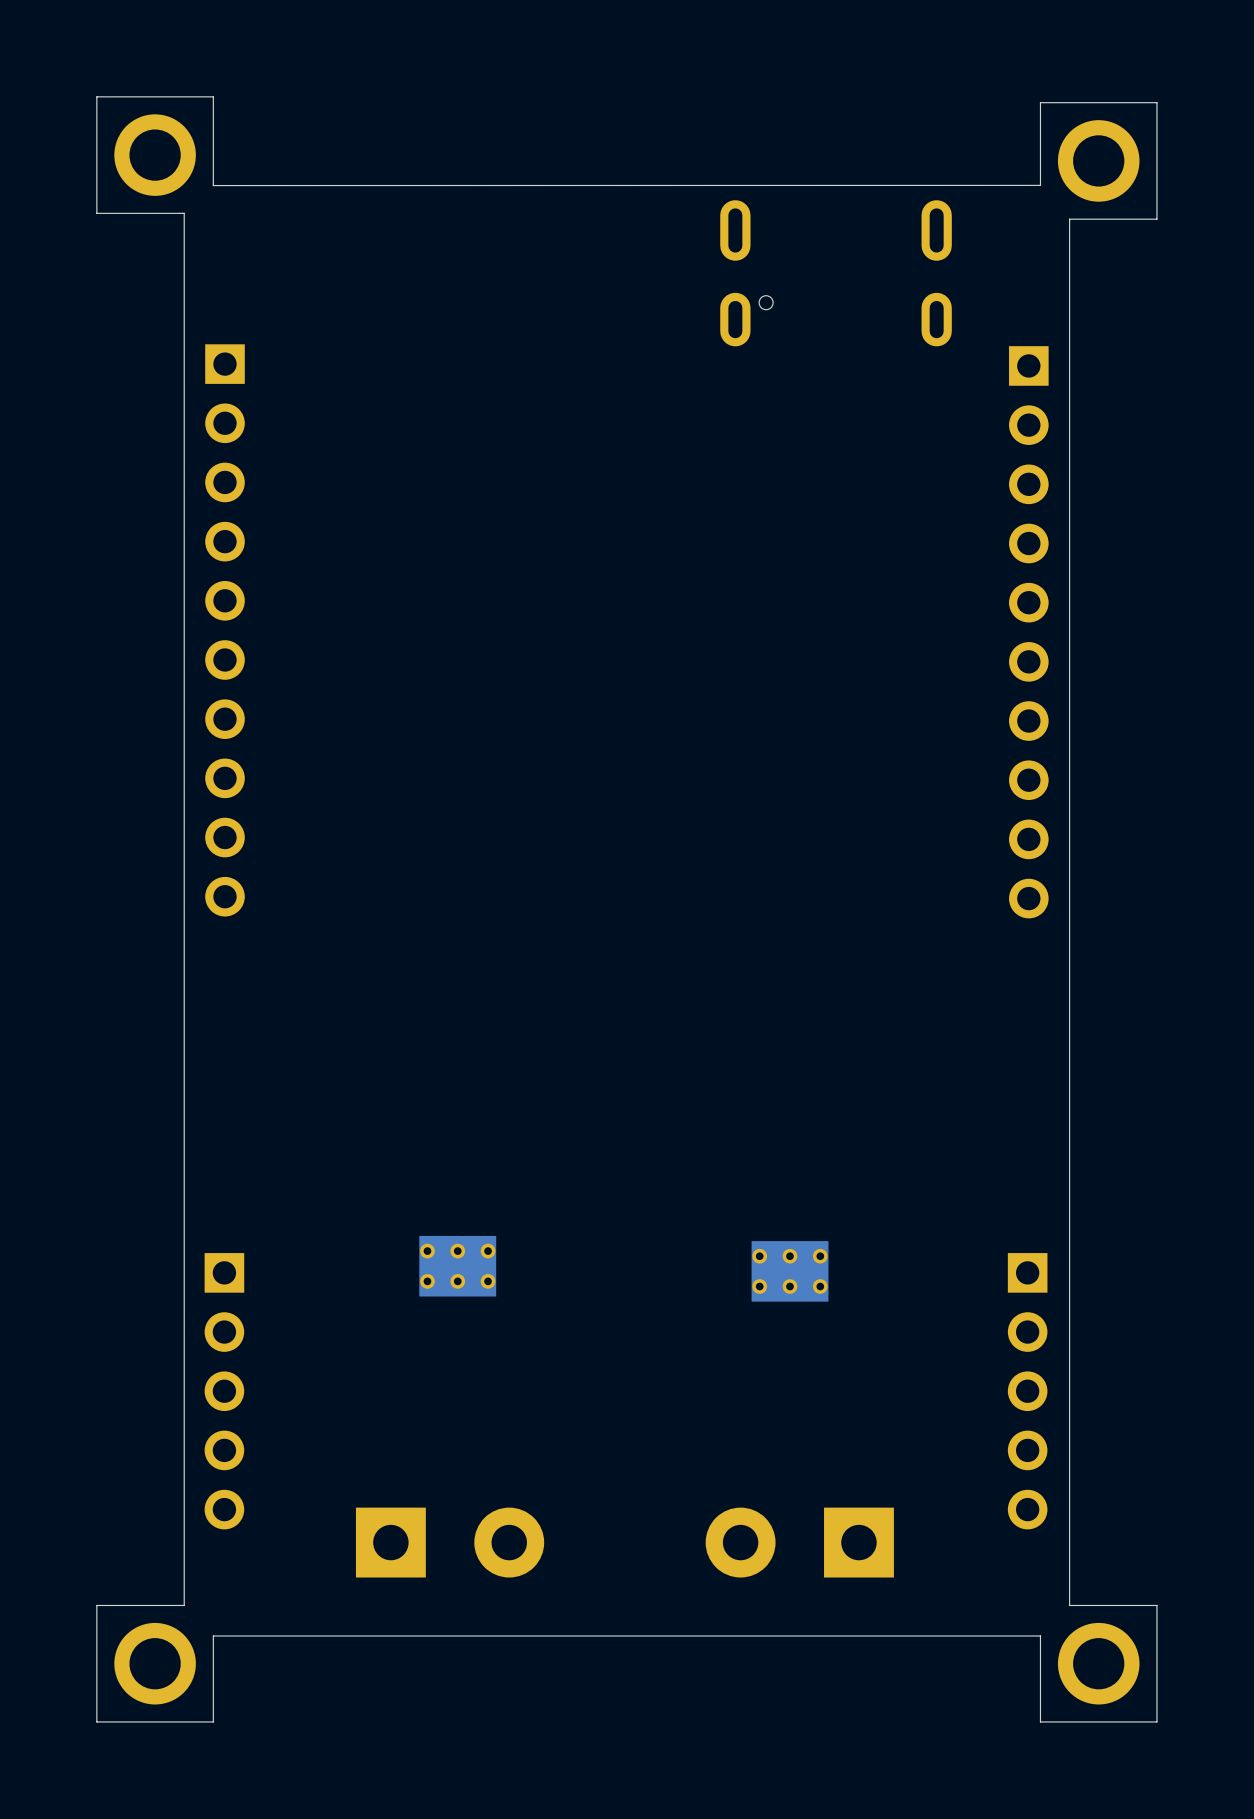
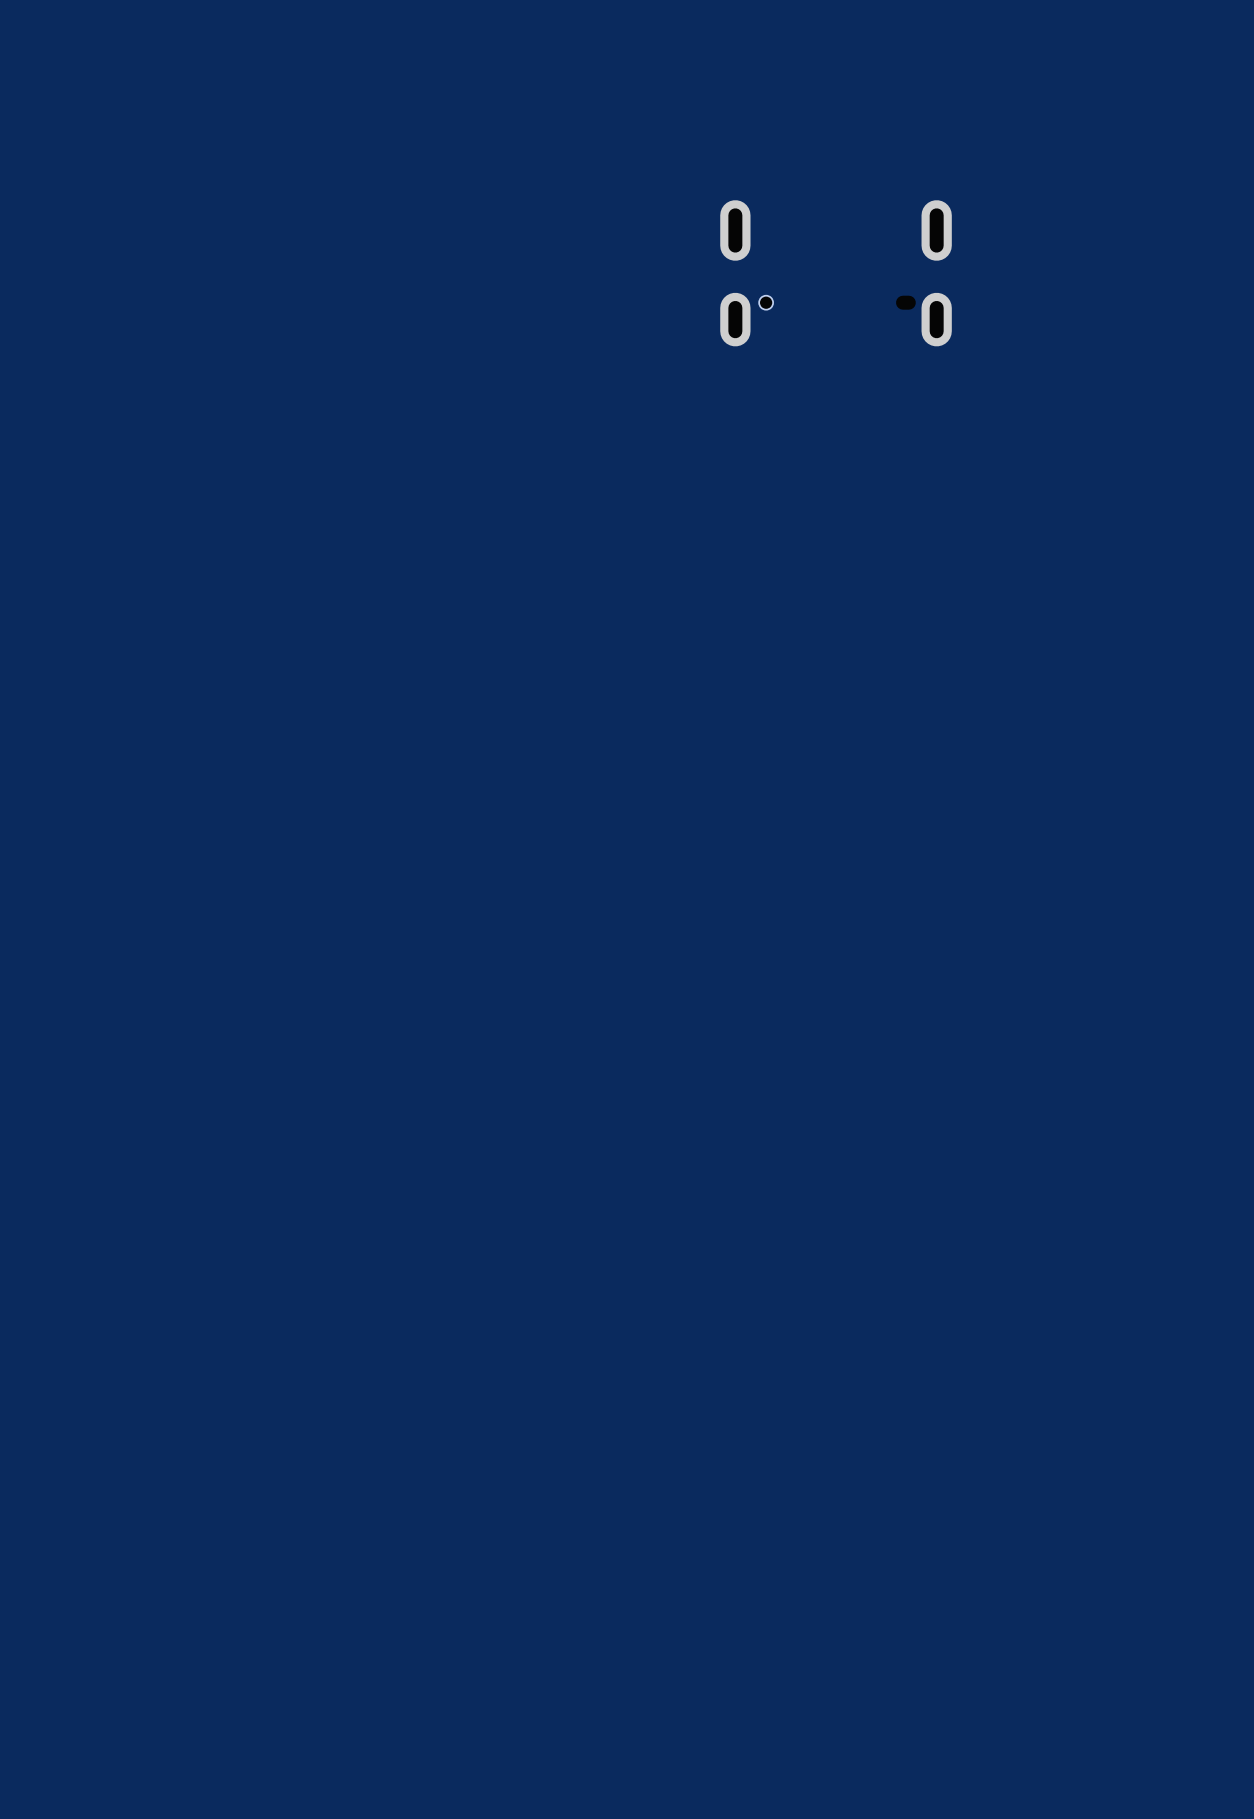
board edge: (213, 96) (213, 185) (1040, 185) (1040, 102) (1156, 102) (1156, 219) (1069, 219) (1069, 1605) (1156, 1605) (1156, 1721) (1040, 1721) (1040, 1635) (213, 1635) (213, 1721) (96, 1721) (96, 1605) (184, 1605) (184, 213) (96, 213) (96, 96) (213, 96) -> none
part: (155, 155) -> none
part: (1098, 160) -> none
part: (225, 630) -> none
part: (1028, 632) -> none
part: (457, 1266) -> none
part: (790, 1271) -> none
part: (224, 1391) -> none
part: (1027, 1391) -> none
part: (450, 1542) -> none
part: (799, 1542) -> none
part: (155, 1663) -> none
part: (1098, 1663) -> none

